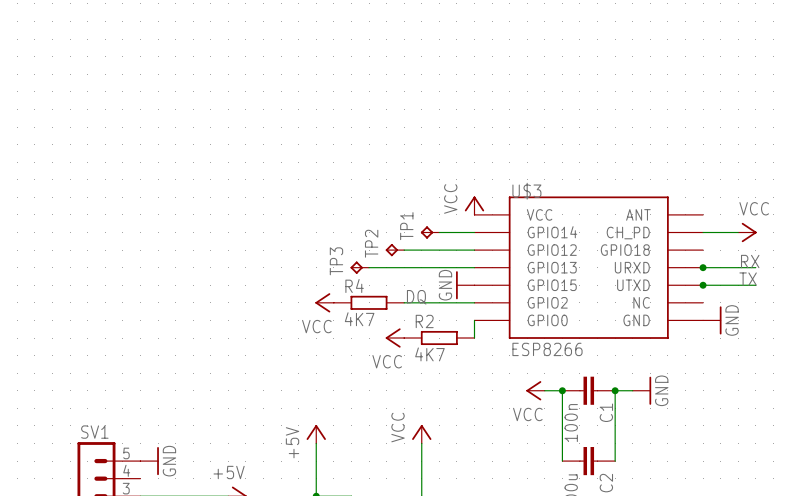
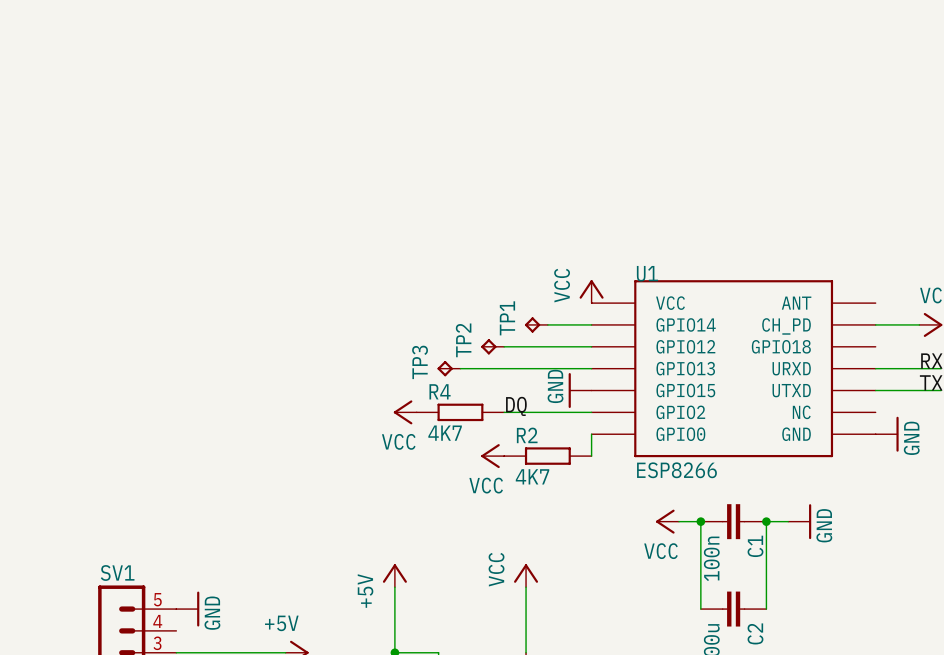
U$3 name: U$3 (526, 191) -> U1 (647, 273)
junction: (703, 267) -> none
junction: (703, 285) -> none

